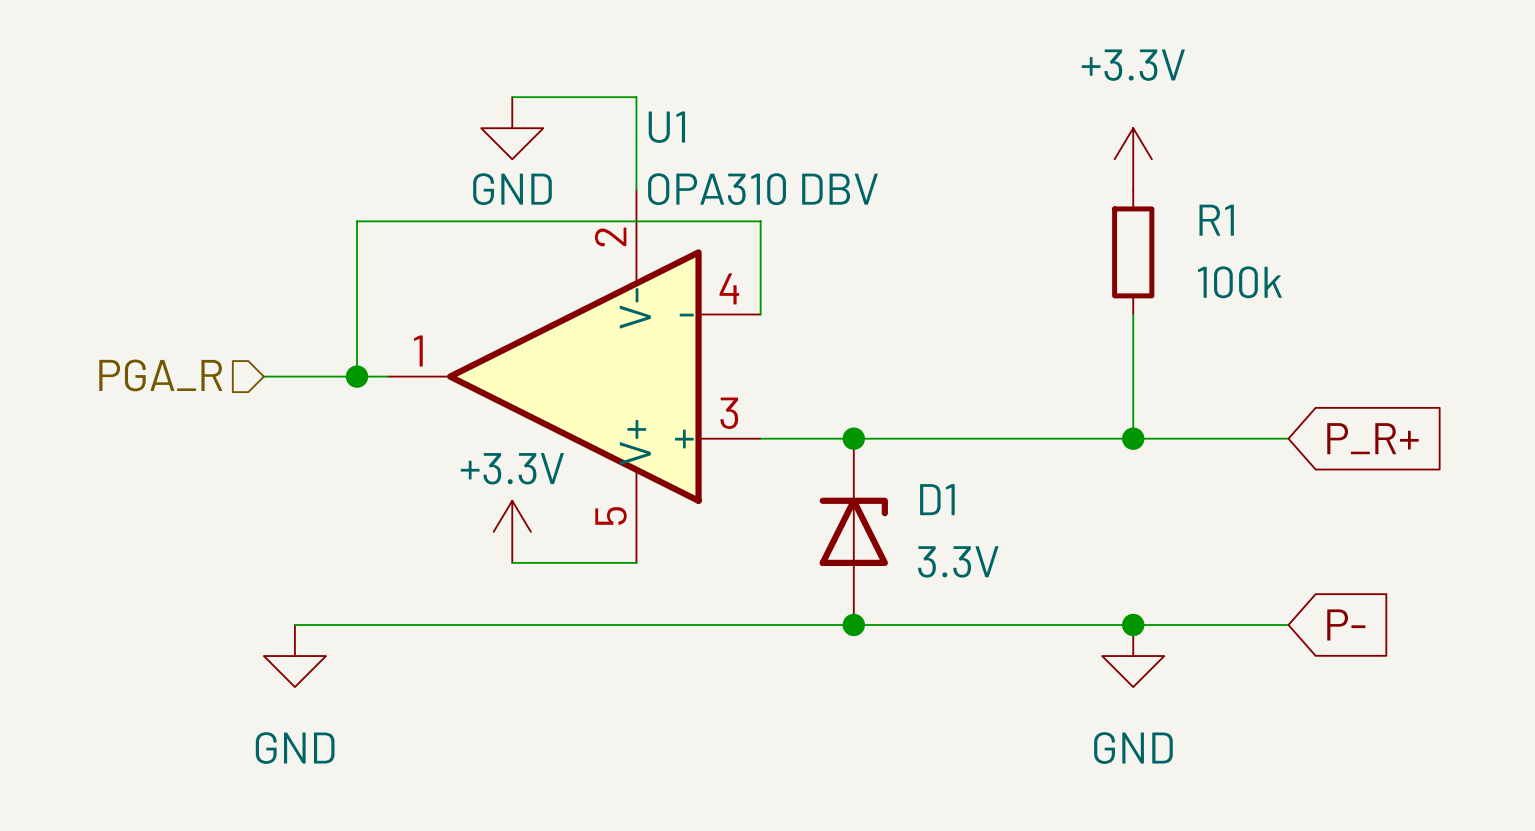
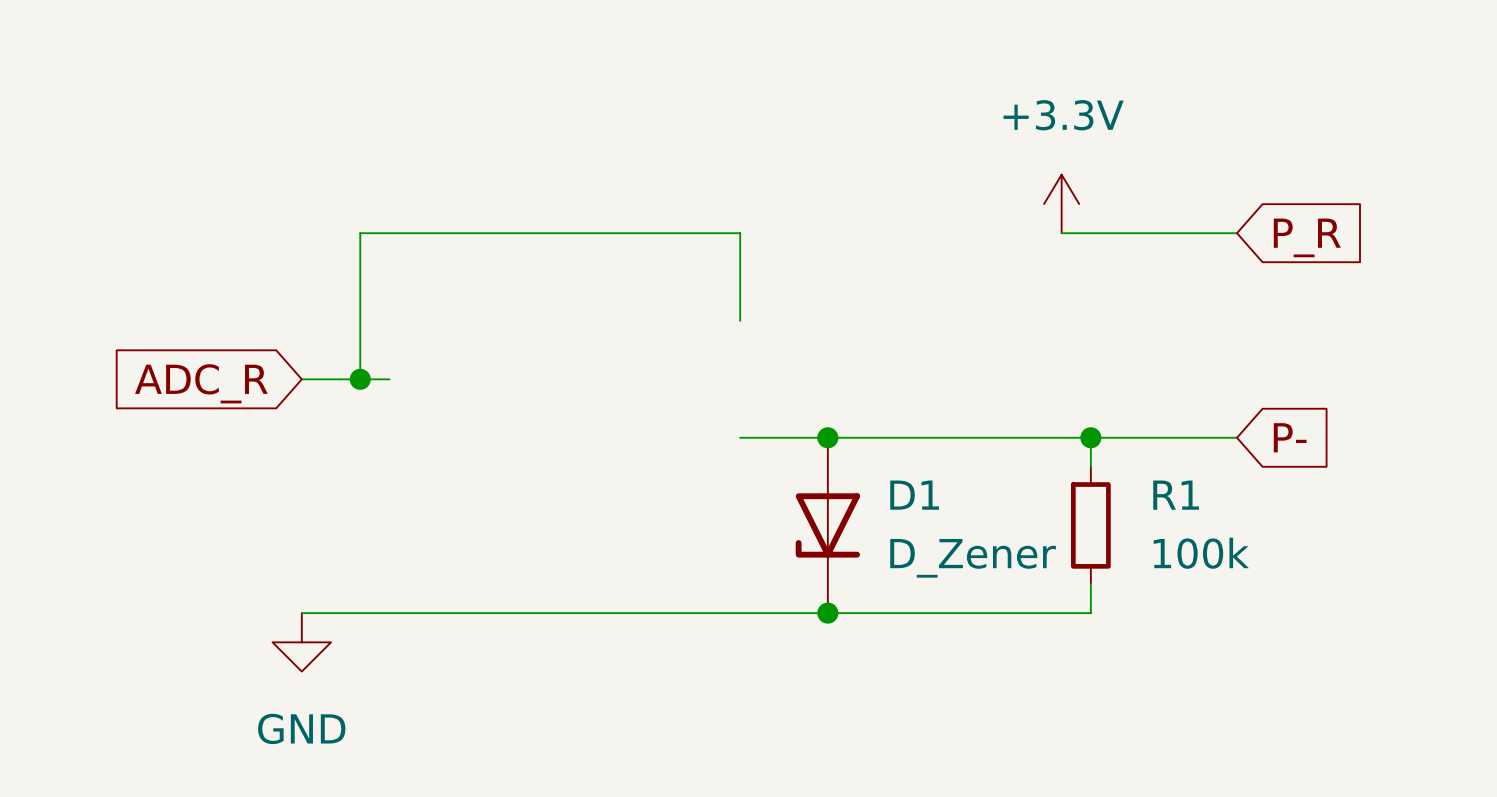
wire: (512, 97) (636, 97) (636, 190) -> none
power symbol: GND (512, 128) -> none
power symbol position: +3.3V (1133, 159) -> +3.3V (1061, 203)
wire: none -> (1061, 233) (1237, 233)
global label: none -> P_R (1307, 237)
R1 position: (1133, 252) -> (1090, 525)
wire: (1133, 314) (1133, 438) -> (1090, 467) (1090, 437)
hierarchical label: PGA_R (160, 375) -> none
global label: none -> ADC_R (201, 383)
wire: (263, 376) (294, 376) -> none
U1: OPA310 DBV (574, 376) -> none
global label: P_R+ (1372, 438) -> P- (1290, 437)
power symbol: +3.3V (512, 531) -> none
D1 rotation: 0° (853, 531) -> 180° (827, 525)
D1 value: 3.3V (958, 561) -> D_Zener (973, 558)
wire: (512, 562) (636, 562) -> none
wire: (1133, 624) (1288, 624) -> (1090, 613) (1090, 583)
junction: (1133, 624) -> none
global label: P- (1346, 624) -> none
power symbol: GND (1133, 656) -> none

